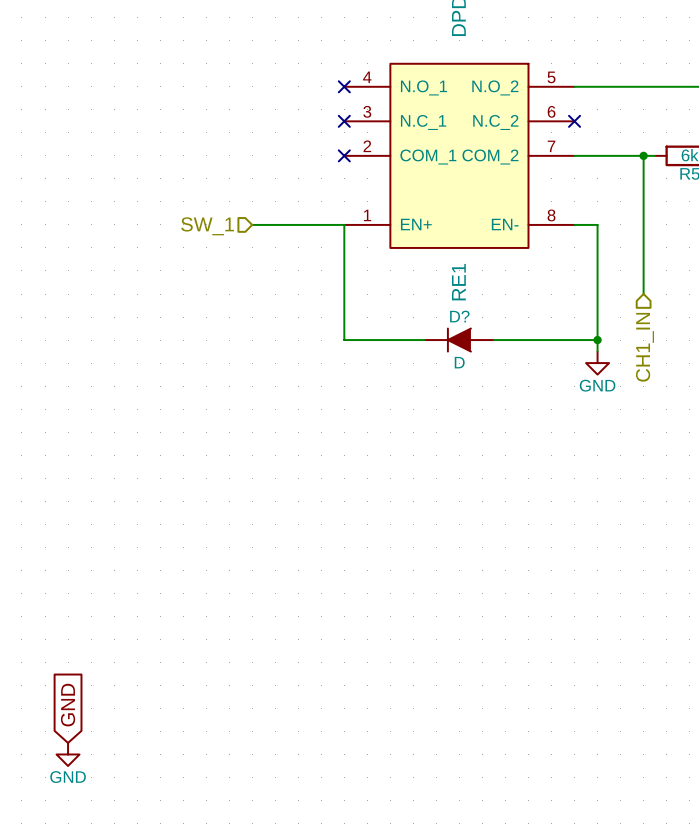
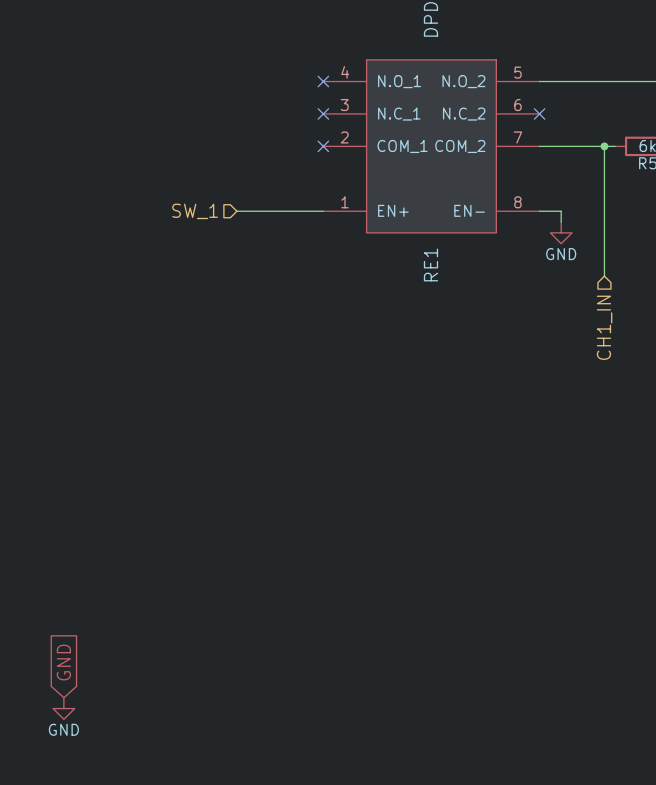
wire: (344, 224) (344, 340) (424, 340) -> none
wire: (597, 236) (597, 351) -> none
D?: D (459, 340) -> none
wire: (493, 340) (597, 340) -> none
junction: (597, 340) -> none
power symbol position: GND (597, 363) -> GND (561, 232)

